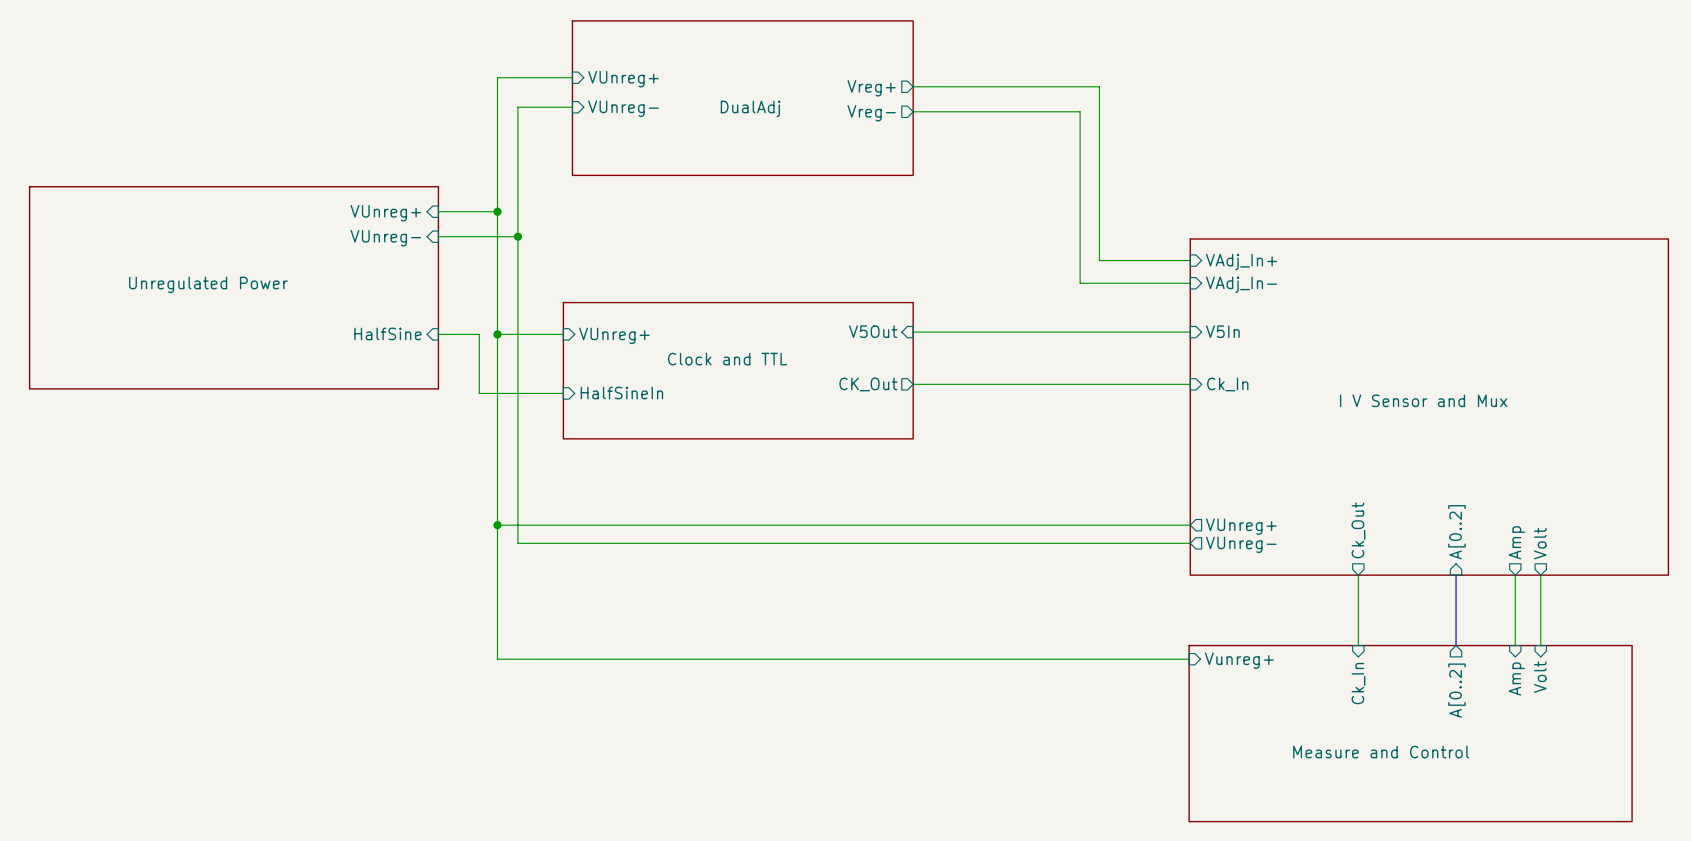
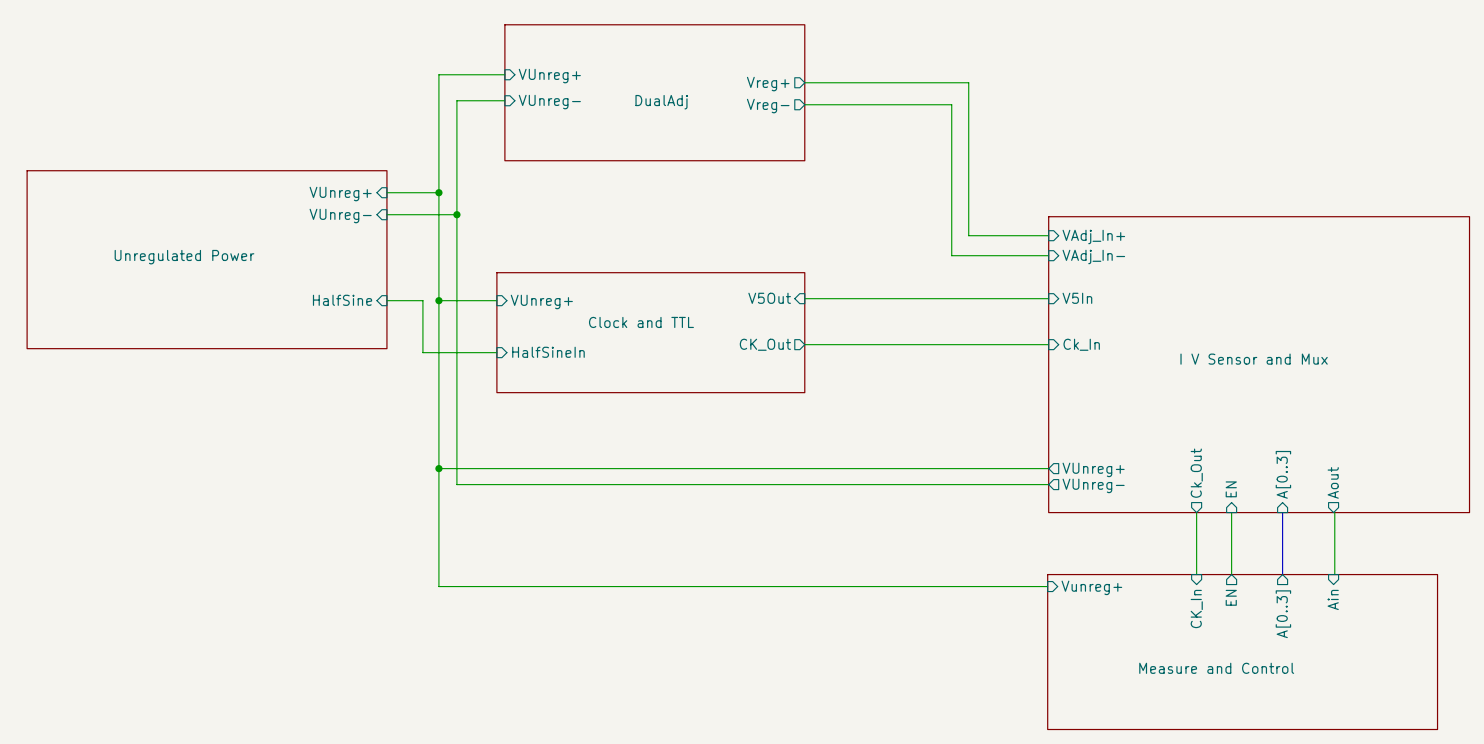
sheet pin: A[0..2] (1456, 532) -> A[0..3] (1283, 474)
sheet pin: Amp (1516, 542) -> Aout (1333, 482)
sheet pin: Volt (1540, 543) -> none
sheet pin: none -> EN (1231, 489)
wire: (1540, 575) (1540, 645) -> (1231, 512) (1231, 574)
sheet pin: none -> EN (1231, 597)
sheet pin: Volt (1540, 677) -> none
sheet pin: Amp (1516, 678) -> Ain (1333, 599)
sheet pin: Ck_In (1358, 683) -> CK_In (1196, 608)
sheet pin: A[0..2] (1456, 690) -> A[0..3] (1283, 614)

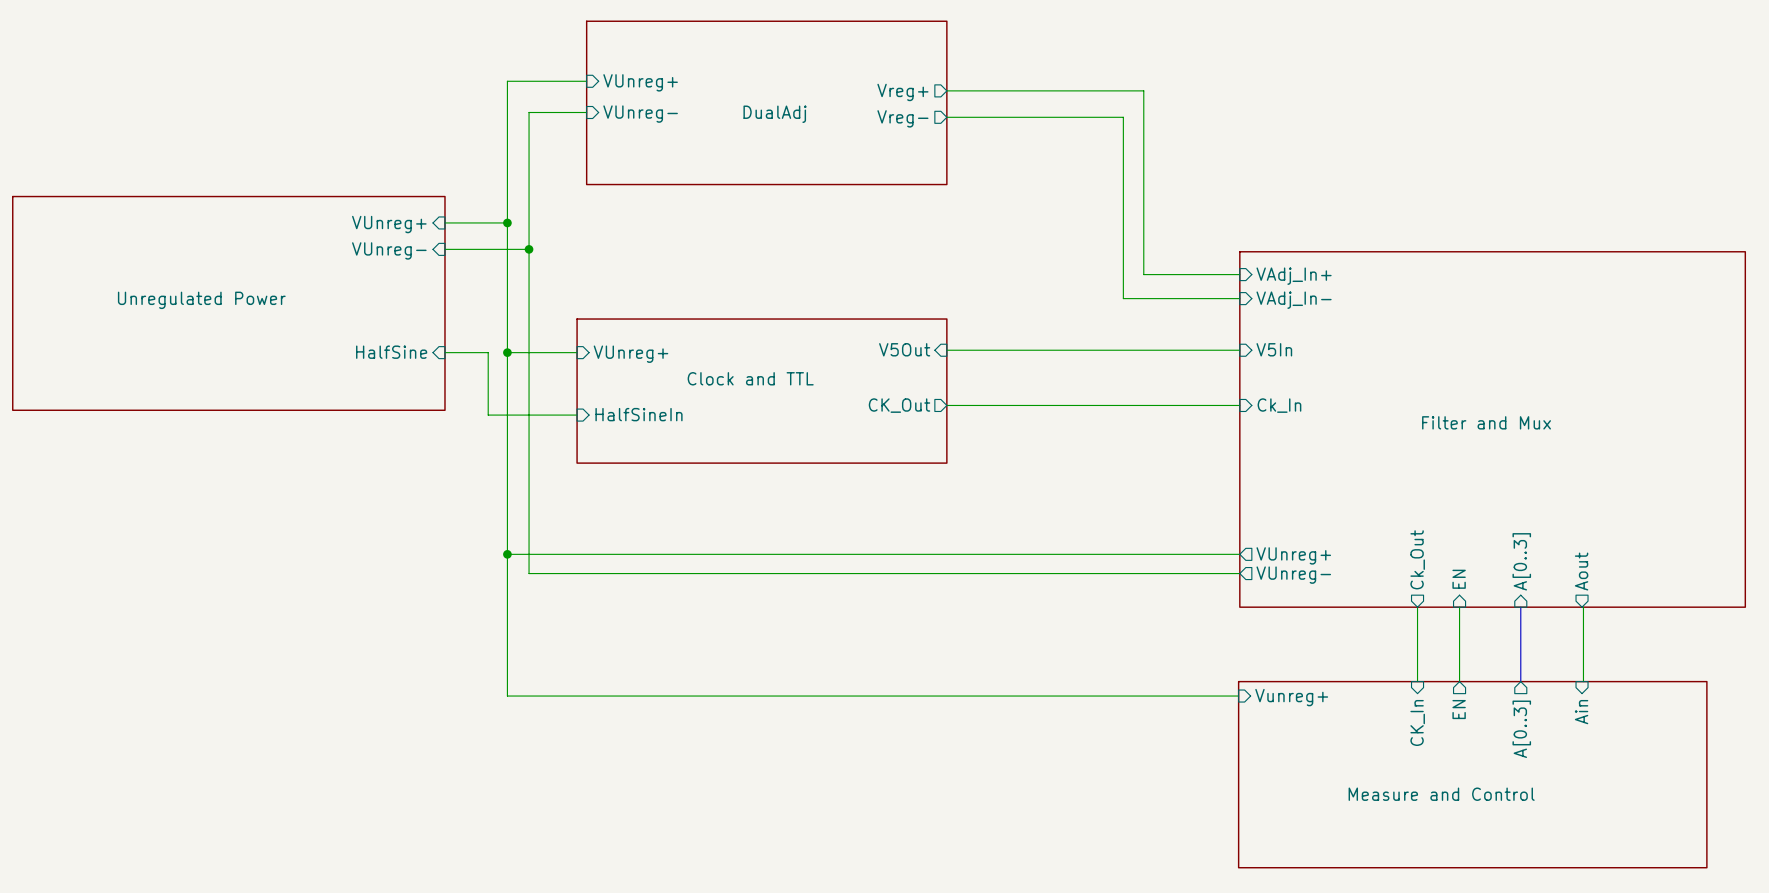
sheet I V Sensor and Mux name: I V Sensor and Mux (1254, 359) -> Filter and Mux (1486, 422)

